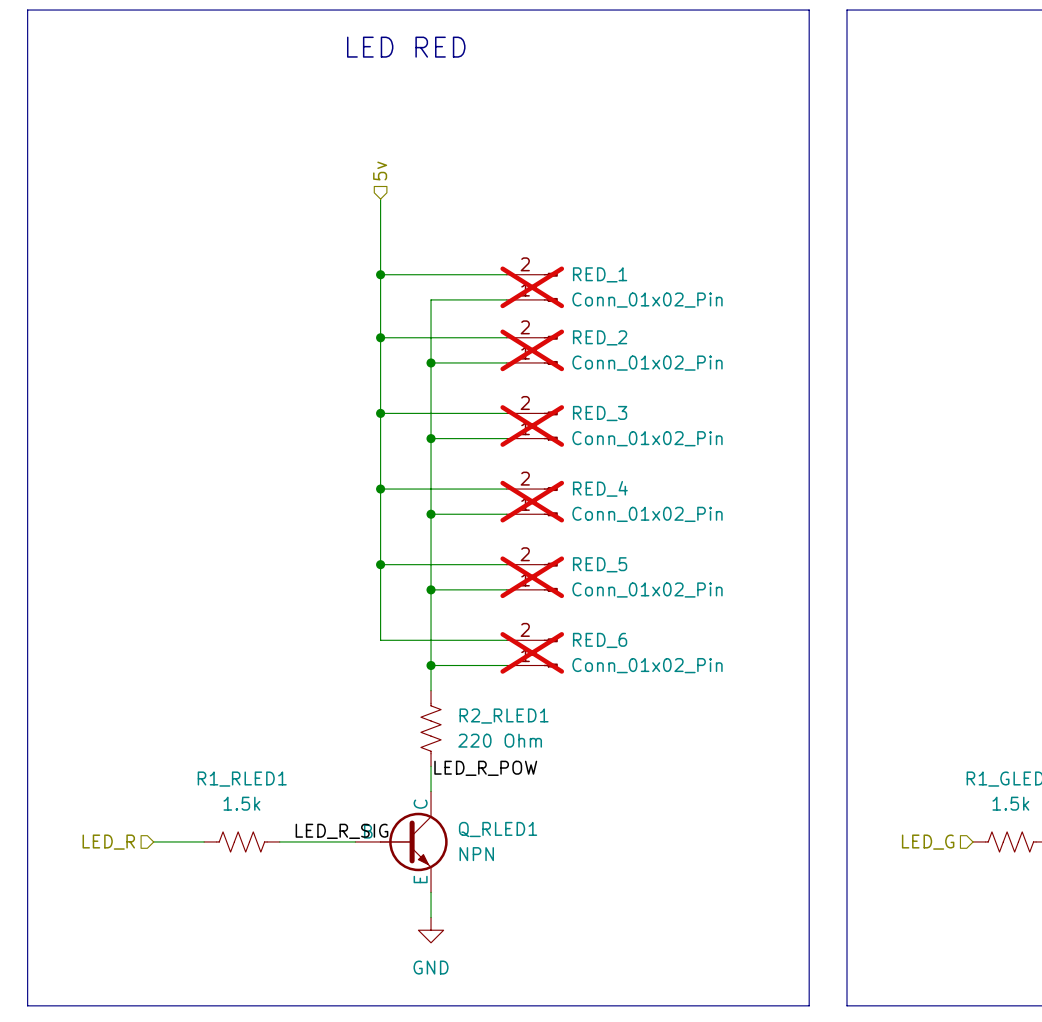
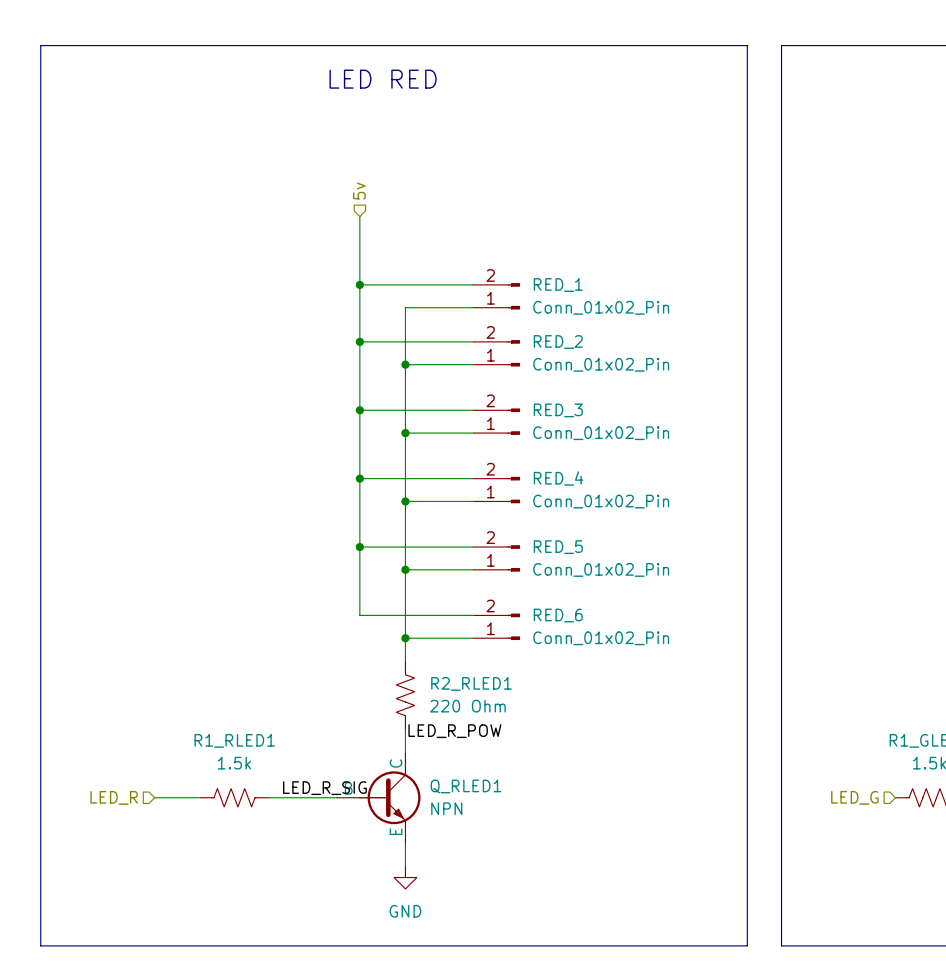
RED_1 do-not-place cross: (532, 287) -> none
RED_2 do-not-place cross: (532, 350) -> none
RED_3 do-not-place cross: (532, 426) -> none
RED_4 do-not-place cross: (532, 501) -> none
RED_5 do-not-place cross: (532, 577) -> none
RED_6 do-not-place cross: (532, 652) -> none

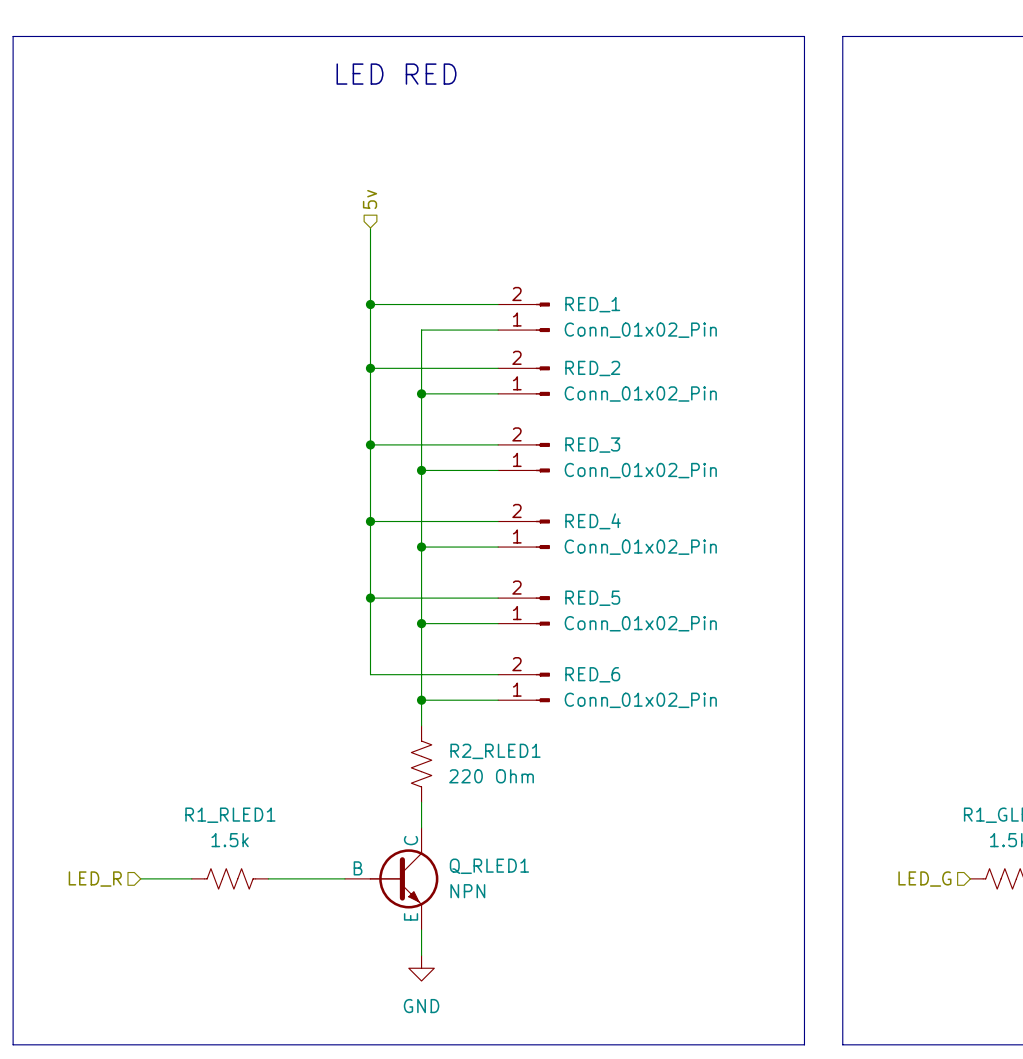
label: LED_R_POW (454, 731) -> none
label: LED_R_SIG (324, 788) -> none

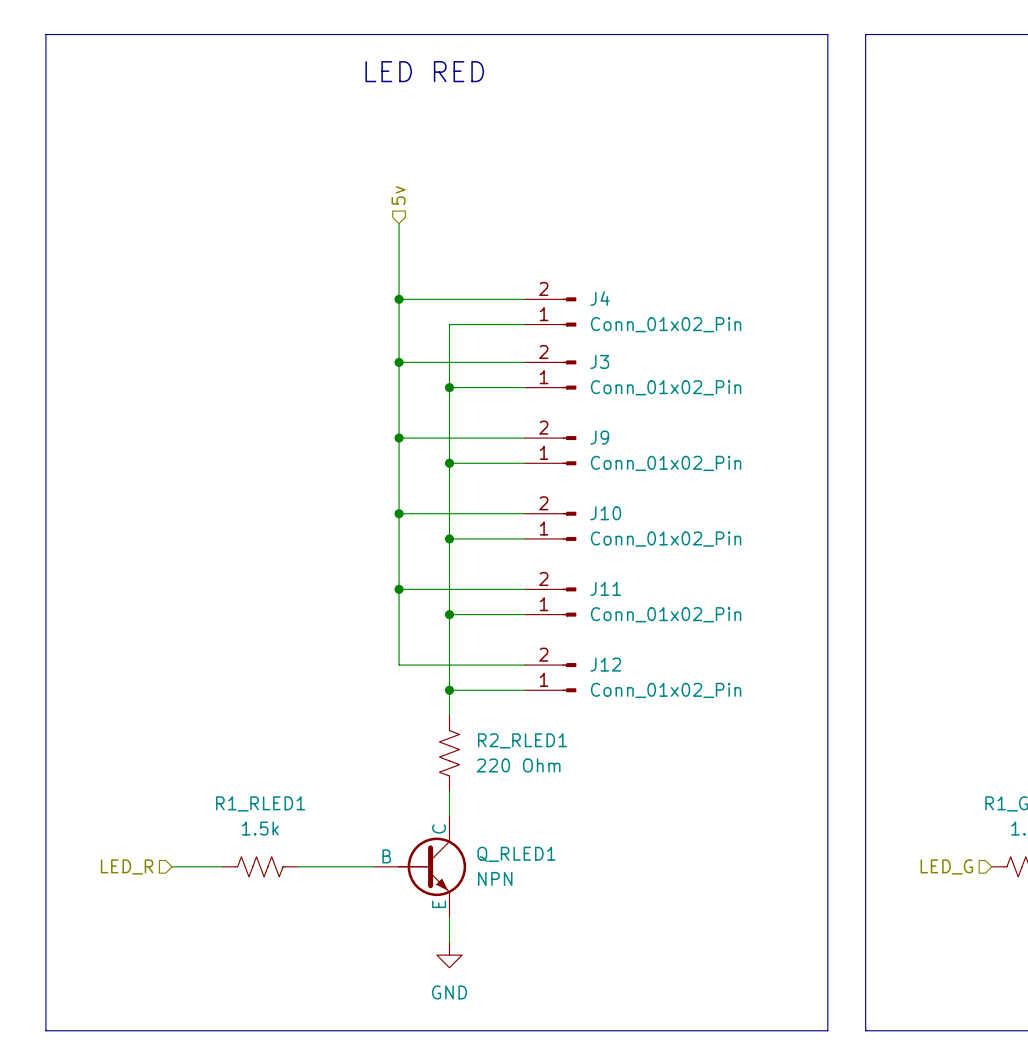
RED_1 name: RED_1 (592, 304) -> J4 (600, 298)
RED_2 name: RED_2 (592, 368) -> J3 (599, 361)
RED_3 name: RED_3 (592, 445) -> J9 (599, 437)
RED_4 name: RED_4 (593, 521) -> J10 (605, 513)
RED_5 name: RED_5 (592, 598) -> J11 (605, 588)
RED_6 name: RED_6 (592, 674) -> J12 (605, 664)

